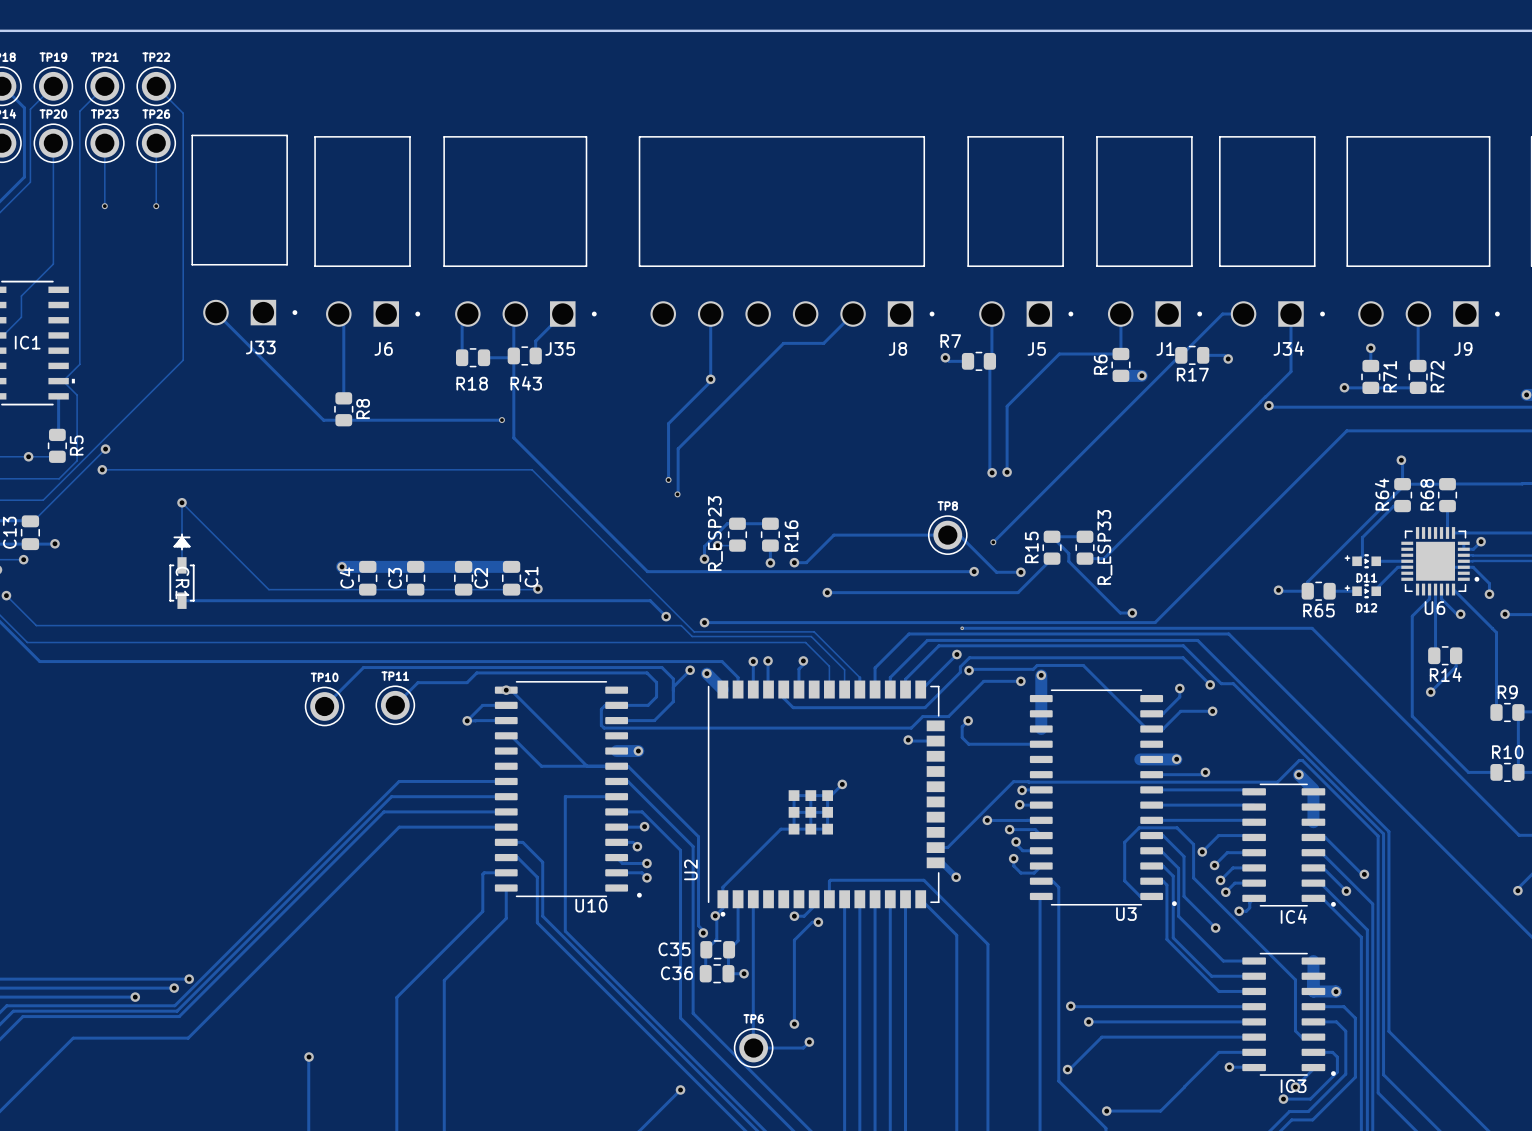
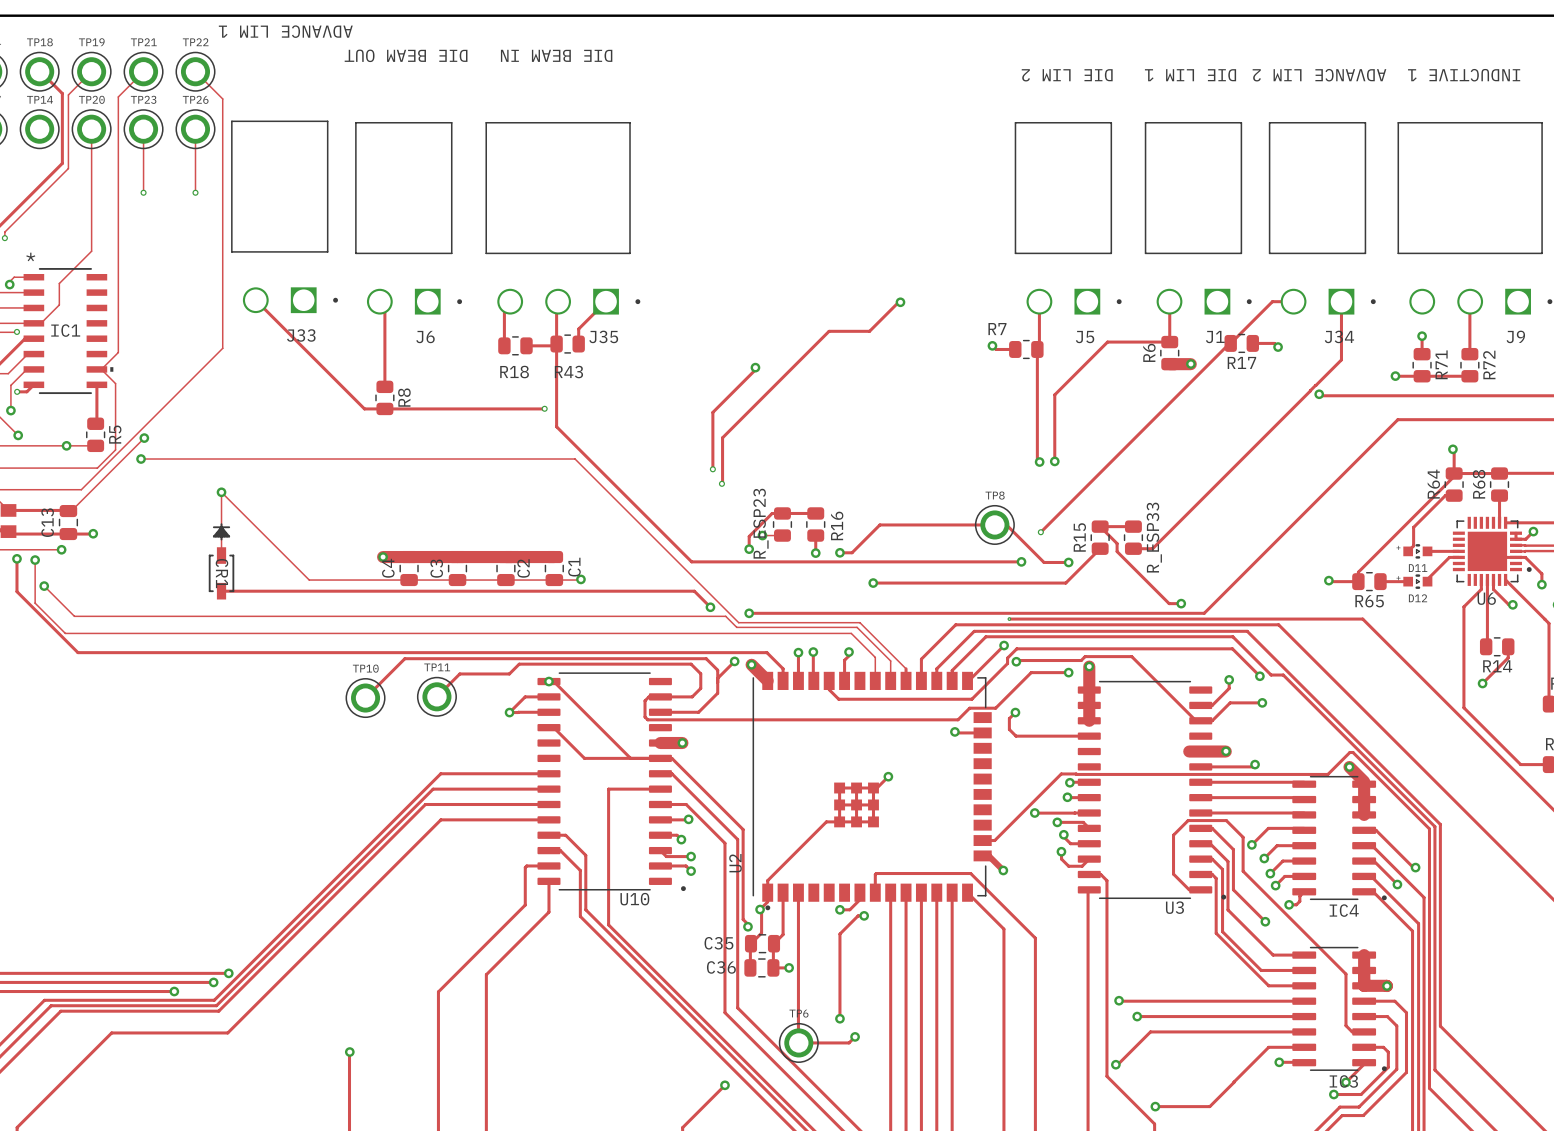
text: none -> ADVANCE LIM 1 (285, 31)
text: none -> DIE BEAM OUT (406, 55)
text: none -> DIE BEAM IN (556, 55)
text: none -> DIE LIM 2 (1067, 75)
text: none -> DIE LIM 1 (1190, 75)
text: none -> ADVANCE LIM 2 (1319, 75)
text: none -> INDUCTIVE 1 (1464, 75)
J8: (786, 231) -> none
track: (710, 314) (710, 379) -> none
via: none -> (900, 302)

